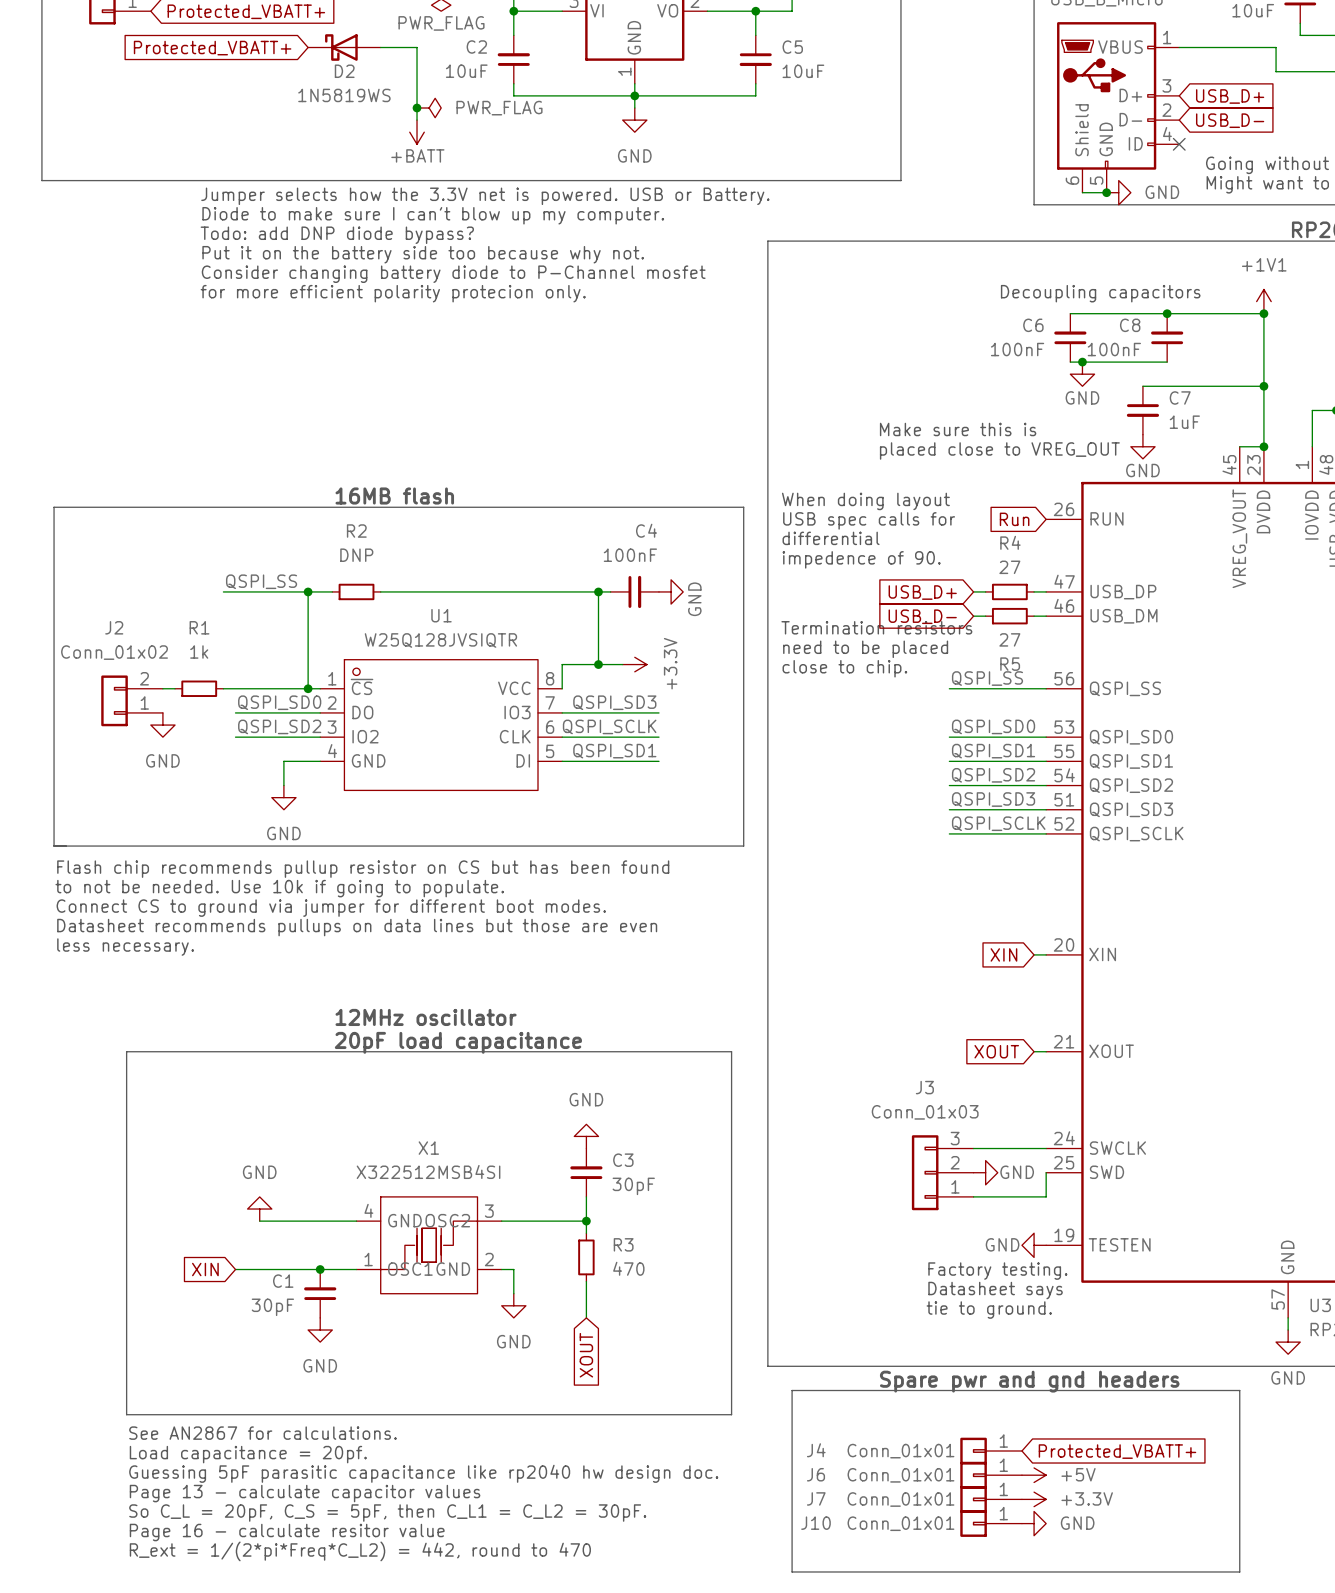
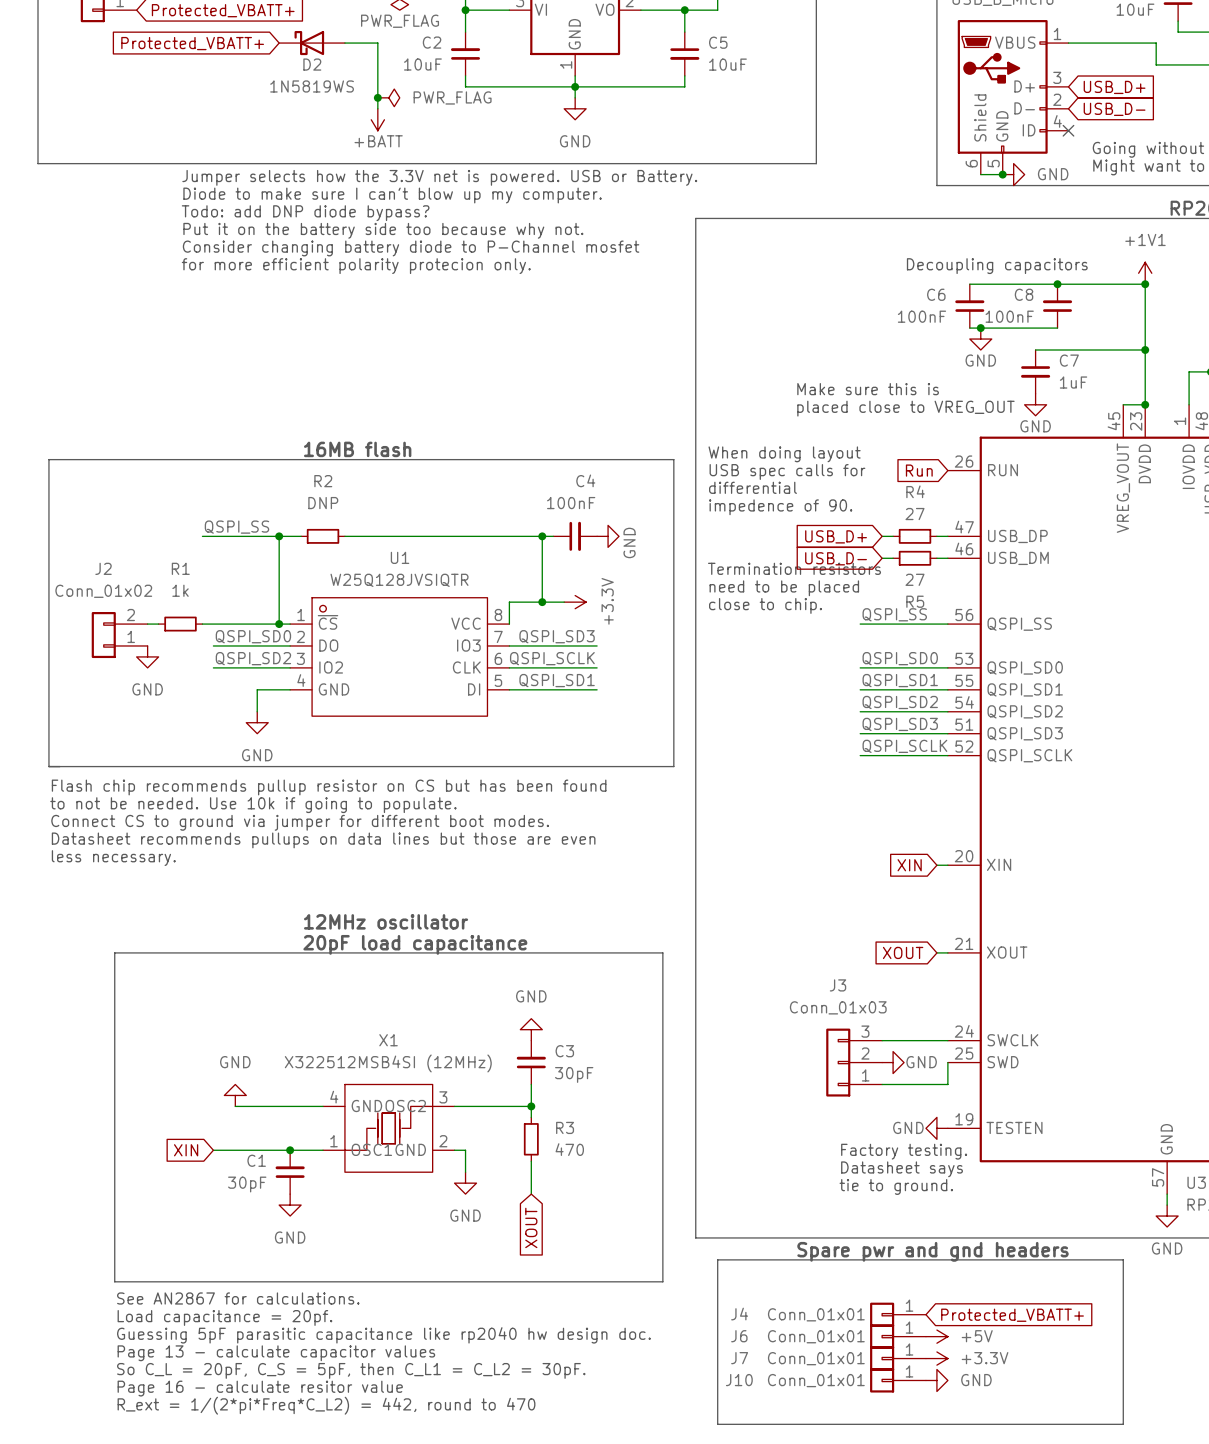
X1 value: X322512MSB4SI (428, 1171) -> X322512MSB4SI (12MHz) (388, 1063)

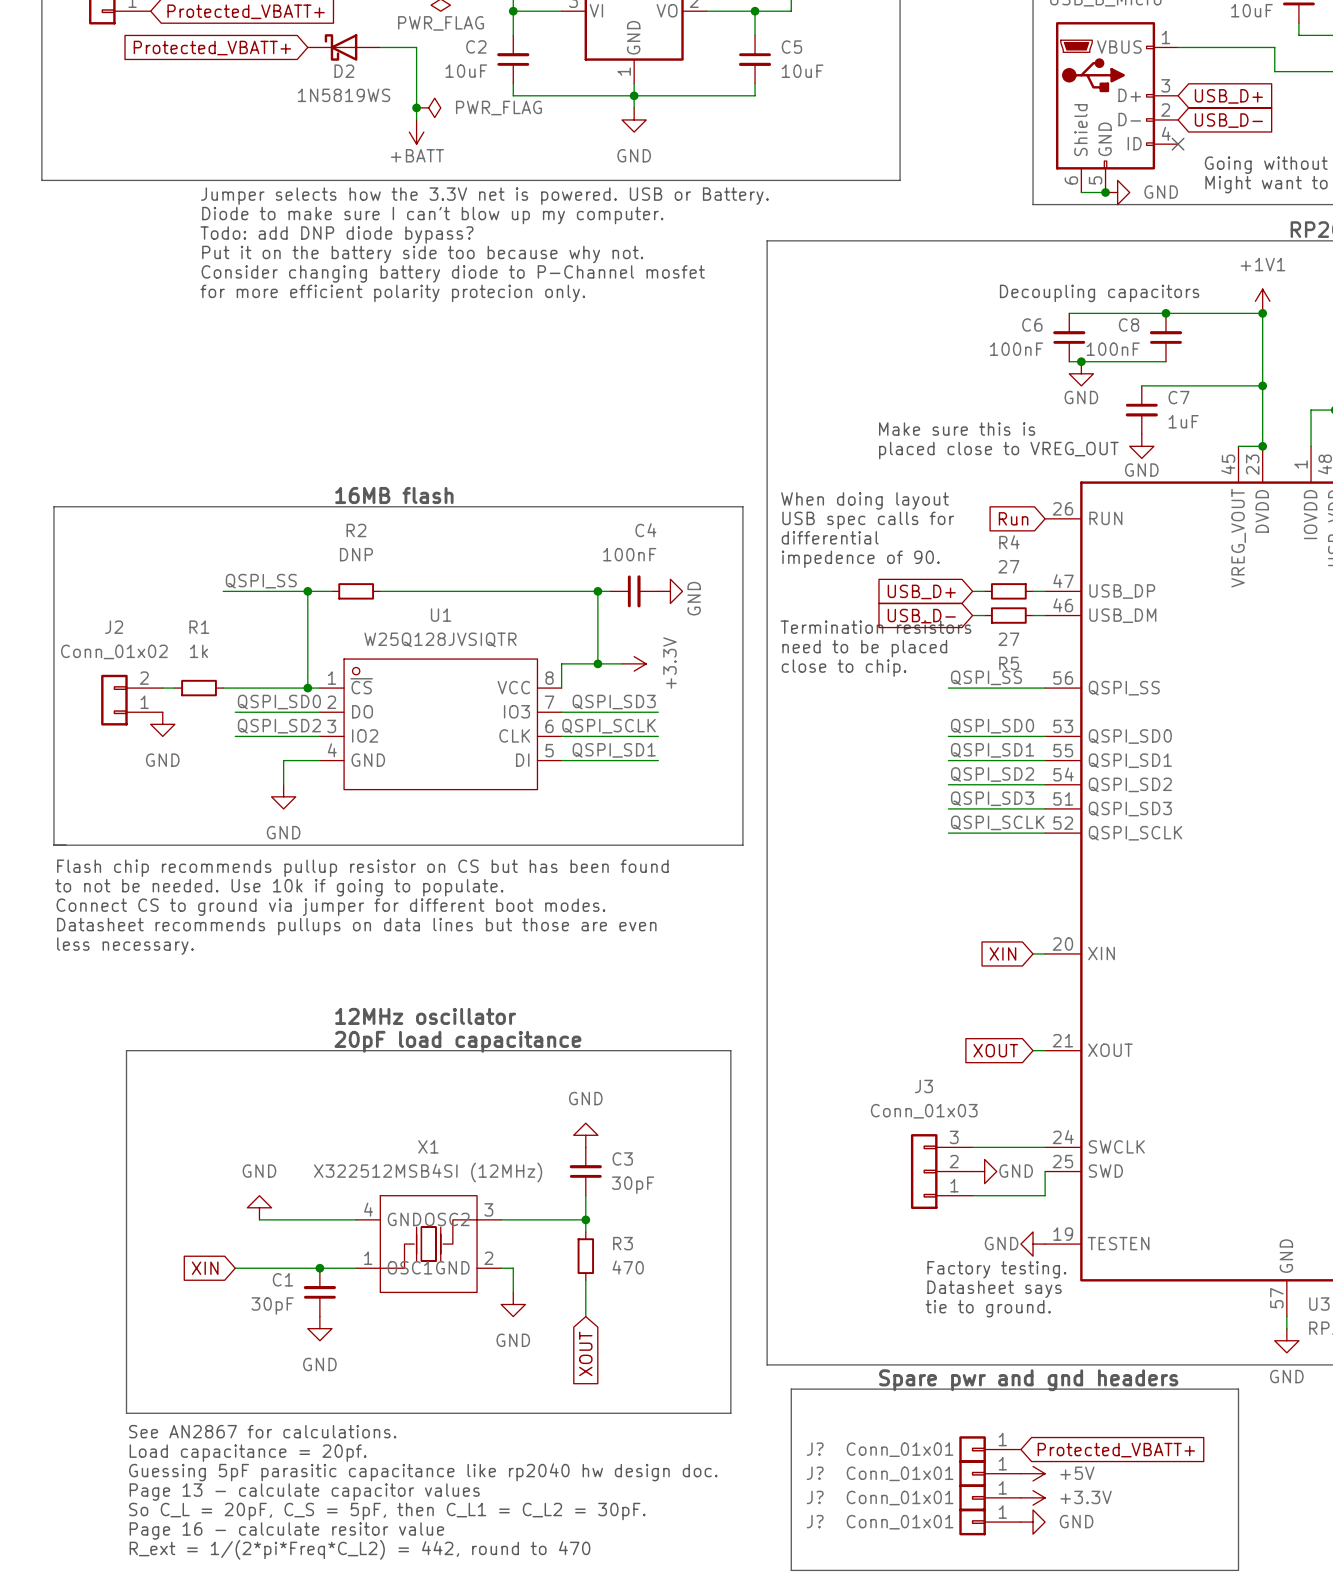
J4 name: J4 (739, 1314) -> J? (815, 1449)
J6 name: J6 (739, 1336) -> J? (815, 1473)
J7 name: J7 (739, 1358) -> J? (815, 1497)
J10 name: J10 (739, 1380) -> J? (815, 1521)

